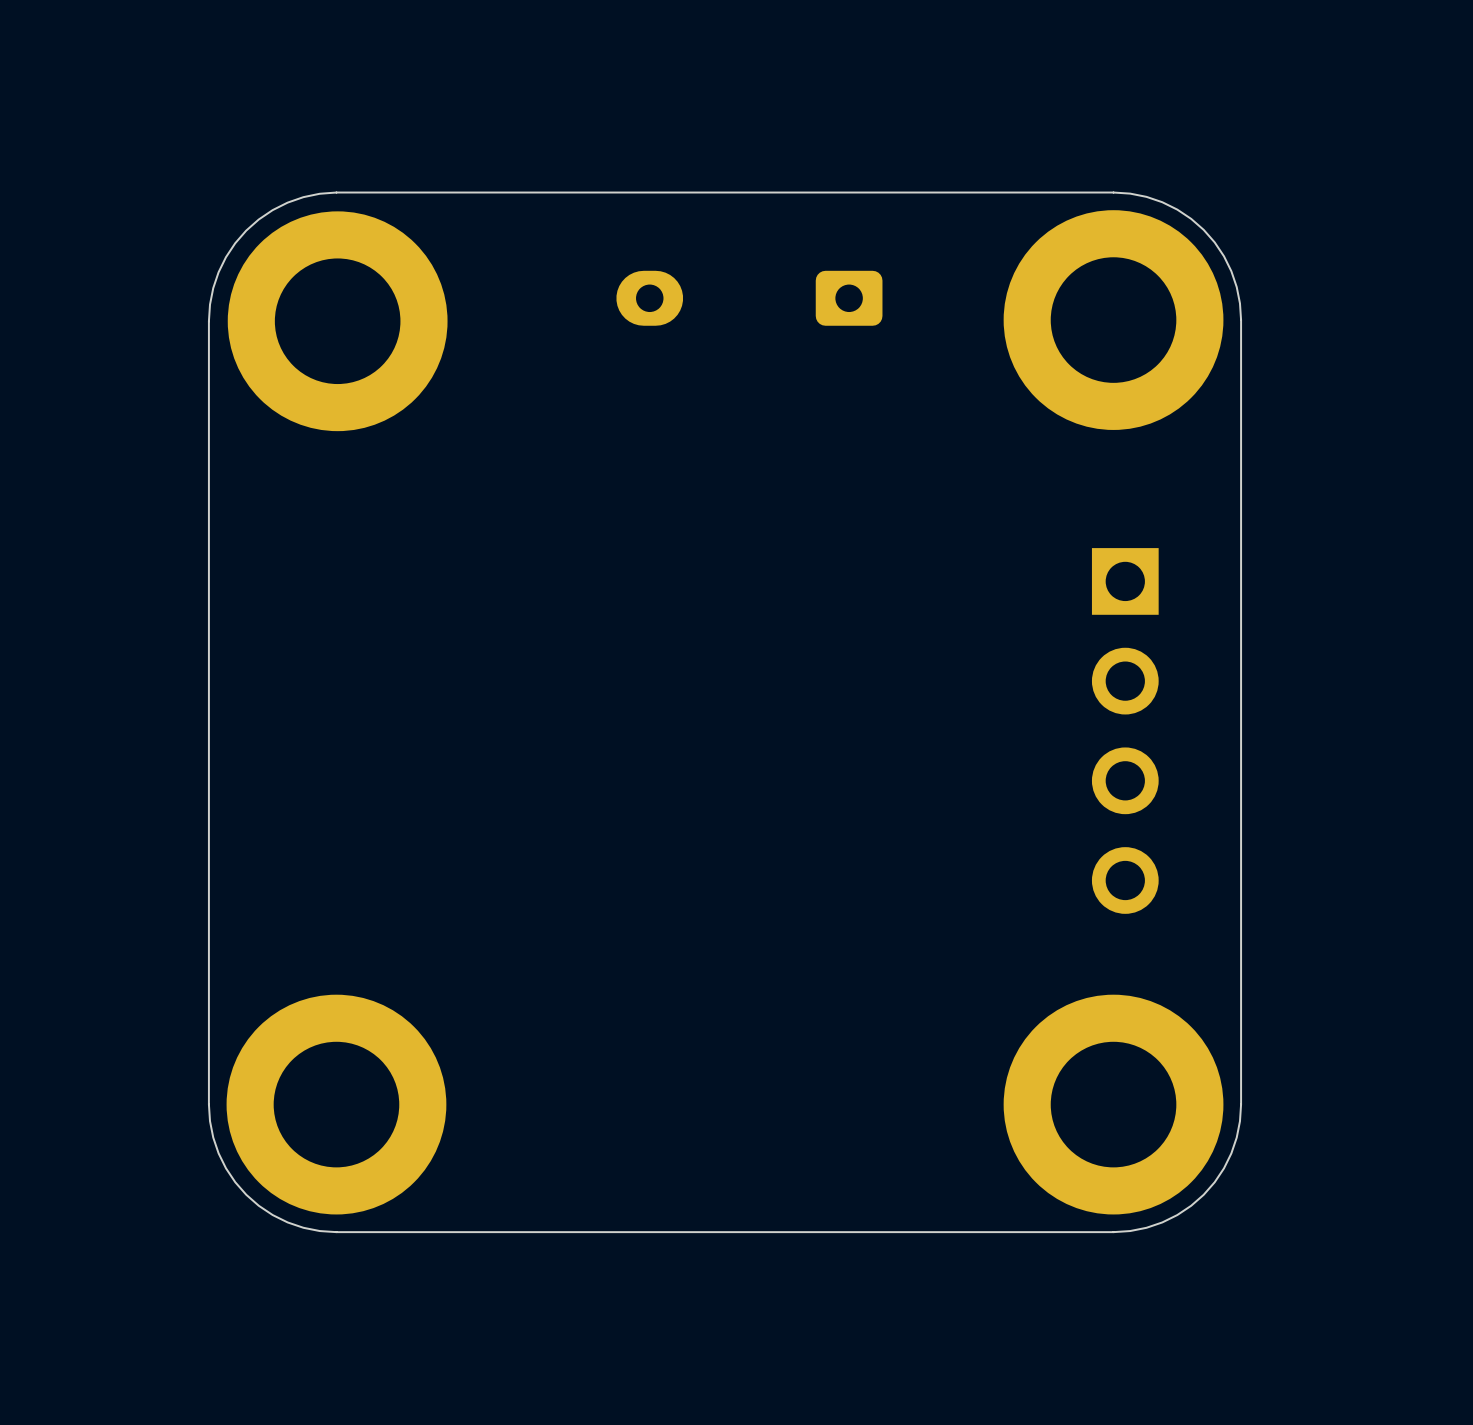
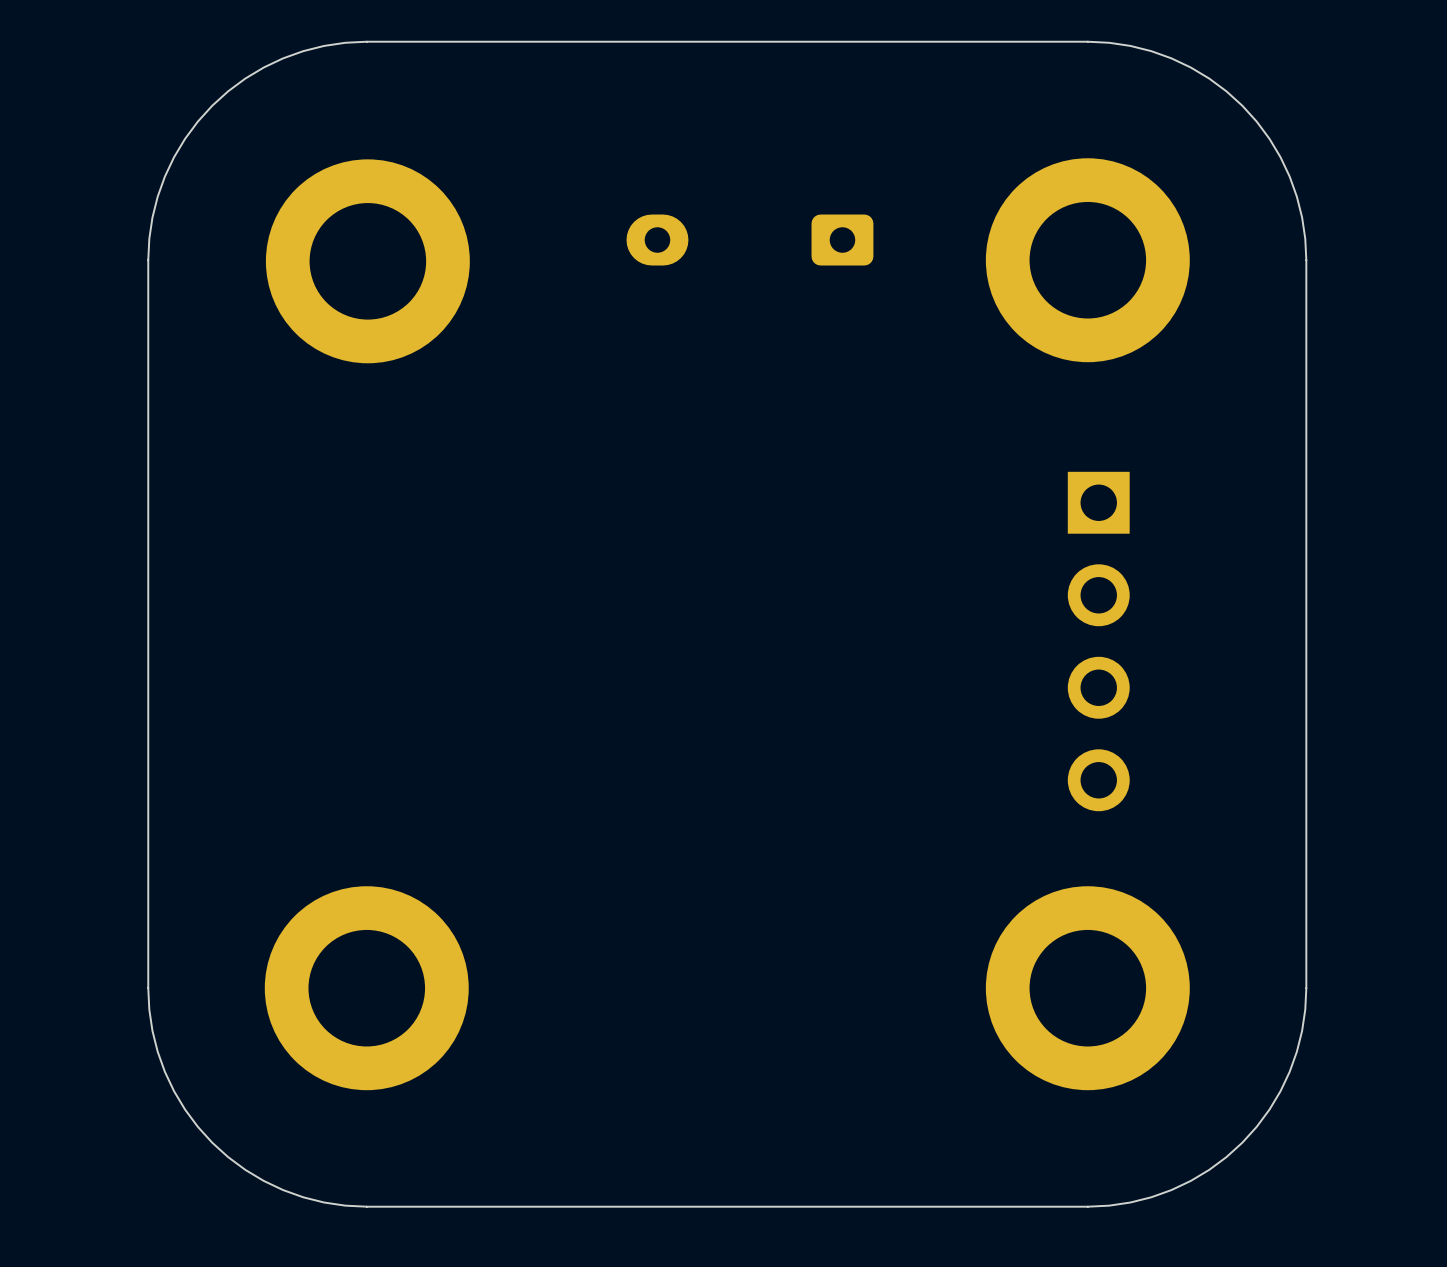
board edge: (1113, 192) (336, 192) (303, 197) (272, 210) (246, 230) (235, 243) (218, 272) (213, 288) (208, 321) (208, 1104) (213, 1137) (218, 1153) (235, 1182) (258, 1205) (272, 1215) (303, 1227) (336, 1232) (1113, 1232) (1146, 1227) (1177, 1215) (1191, 1205) (1214, 1182) (1231, 1153) (1236, 1137) (1241, 1104) (1239, 303) (1231, 271) (1223, 256) (1203, 229) (1191, 218) (1162, 202) (1146, 196) (1113, 192) -> (1087, 41) (1109, 42) (1151, 51) (1190, 67) (1226, 91) (1256, 121) (1280, 157) (1289, 176) (1302, 217) (1306, 260) (1305, 1009) (1296, 1051) (1289, 1071) (1269, 1109) (1256, 1126) (1242, 1142) (1209, 1169) (1171, 1190) (1130, 1202) (1087, 1206) (345, 1205) (324, 1202) (283, 1190) (245, 1169) (228, 1157) (197, 1126) (174, 1091) (157, 1051) (152, 1030) (148, 988) (149, 238) (157, 196) (164, 176) (185, 138) (197, 121) (228, 91) (263, 67) (303, 51) (345, 42) (1087, 41)

